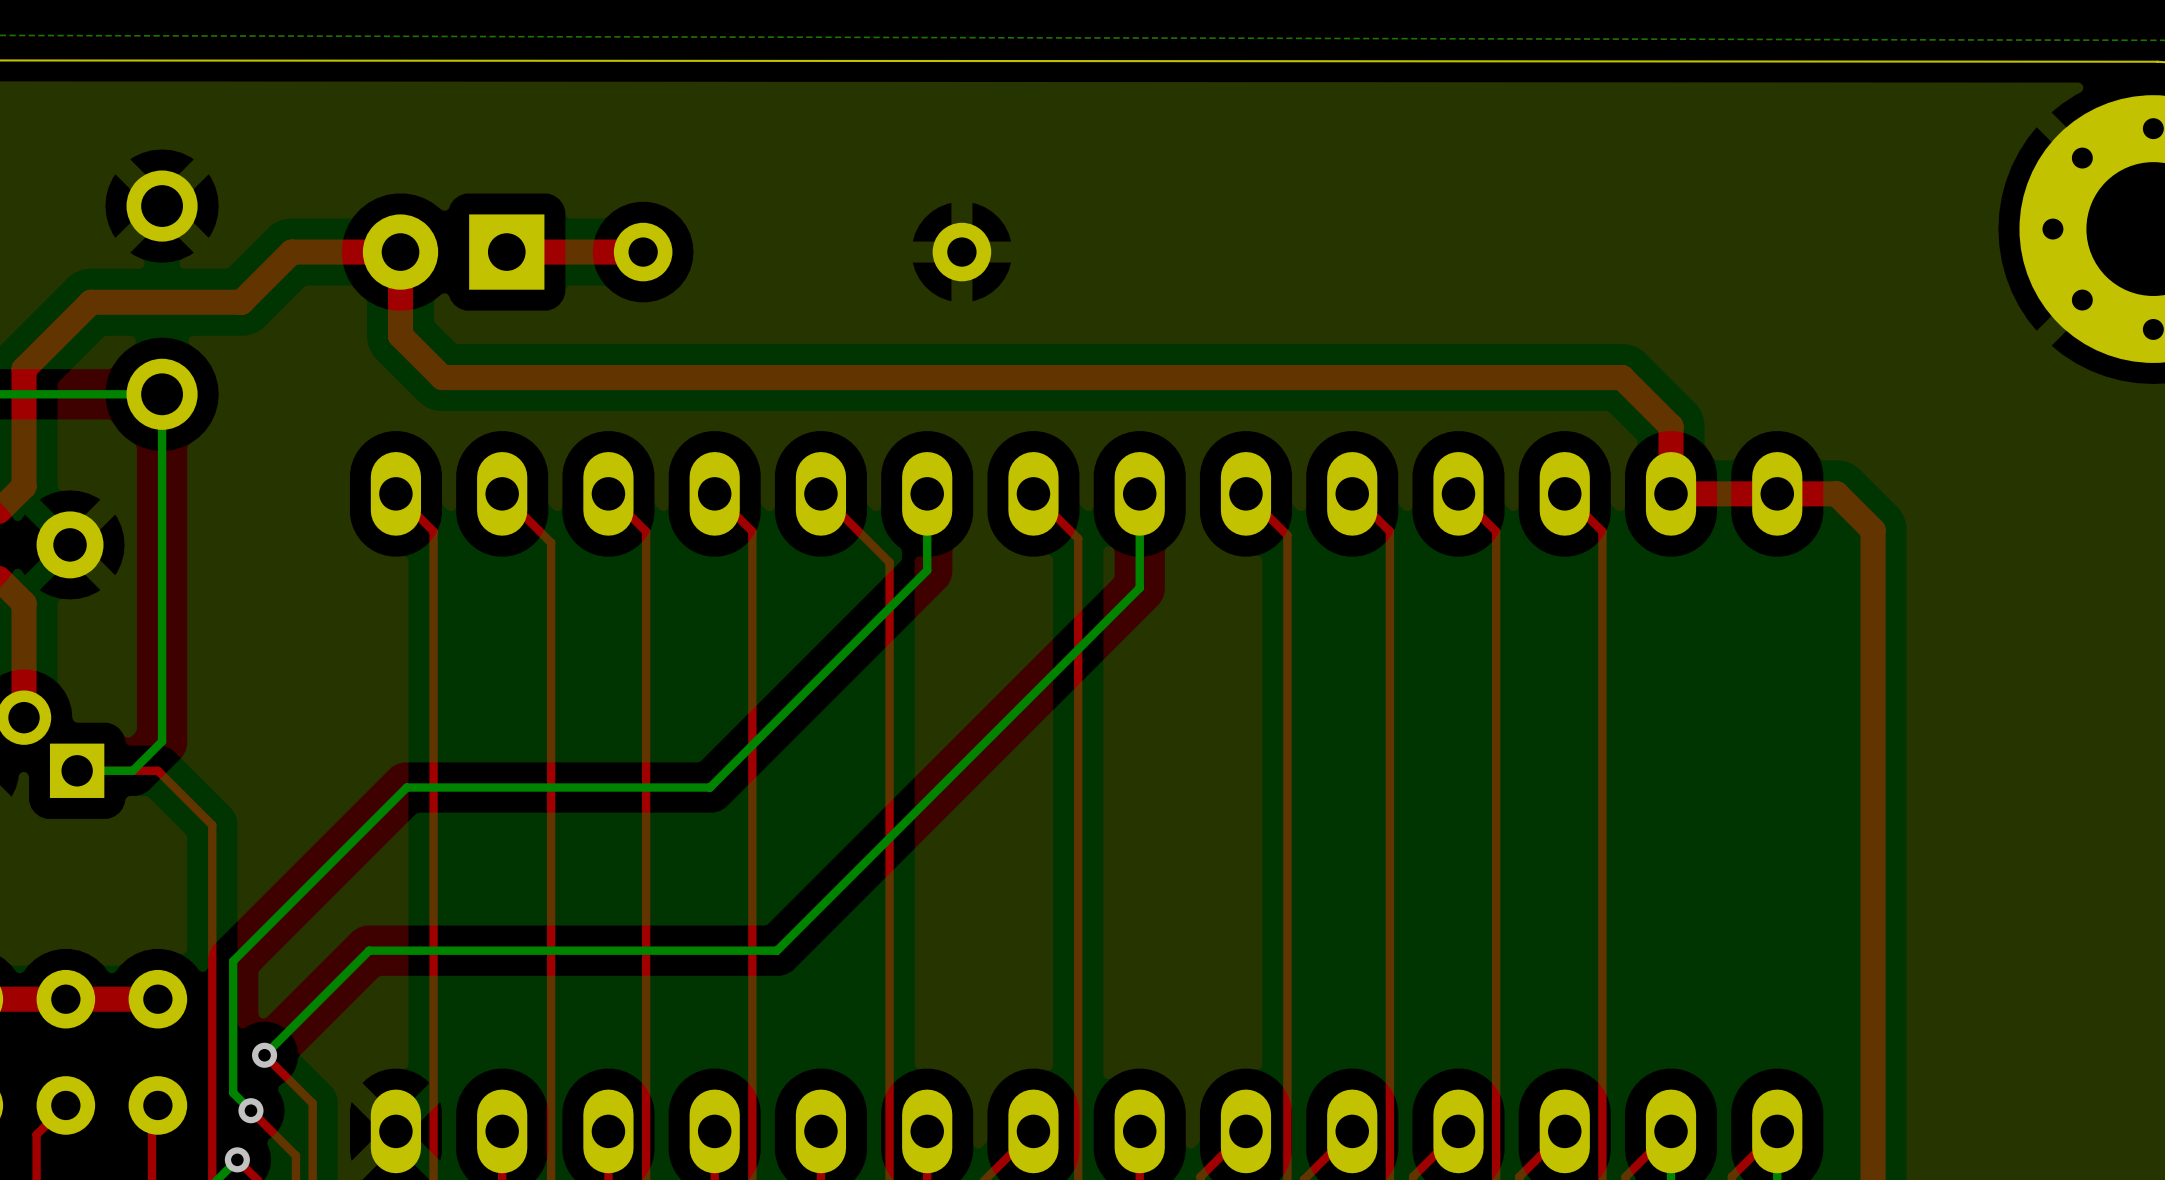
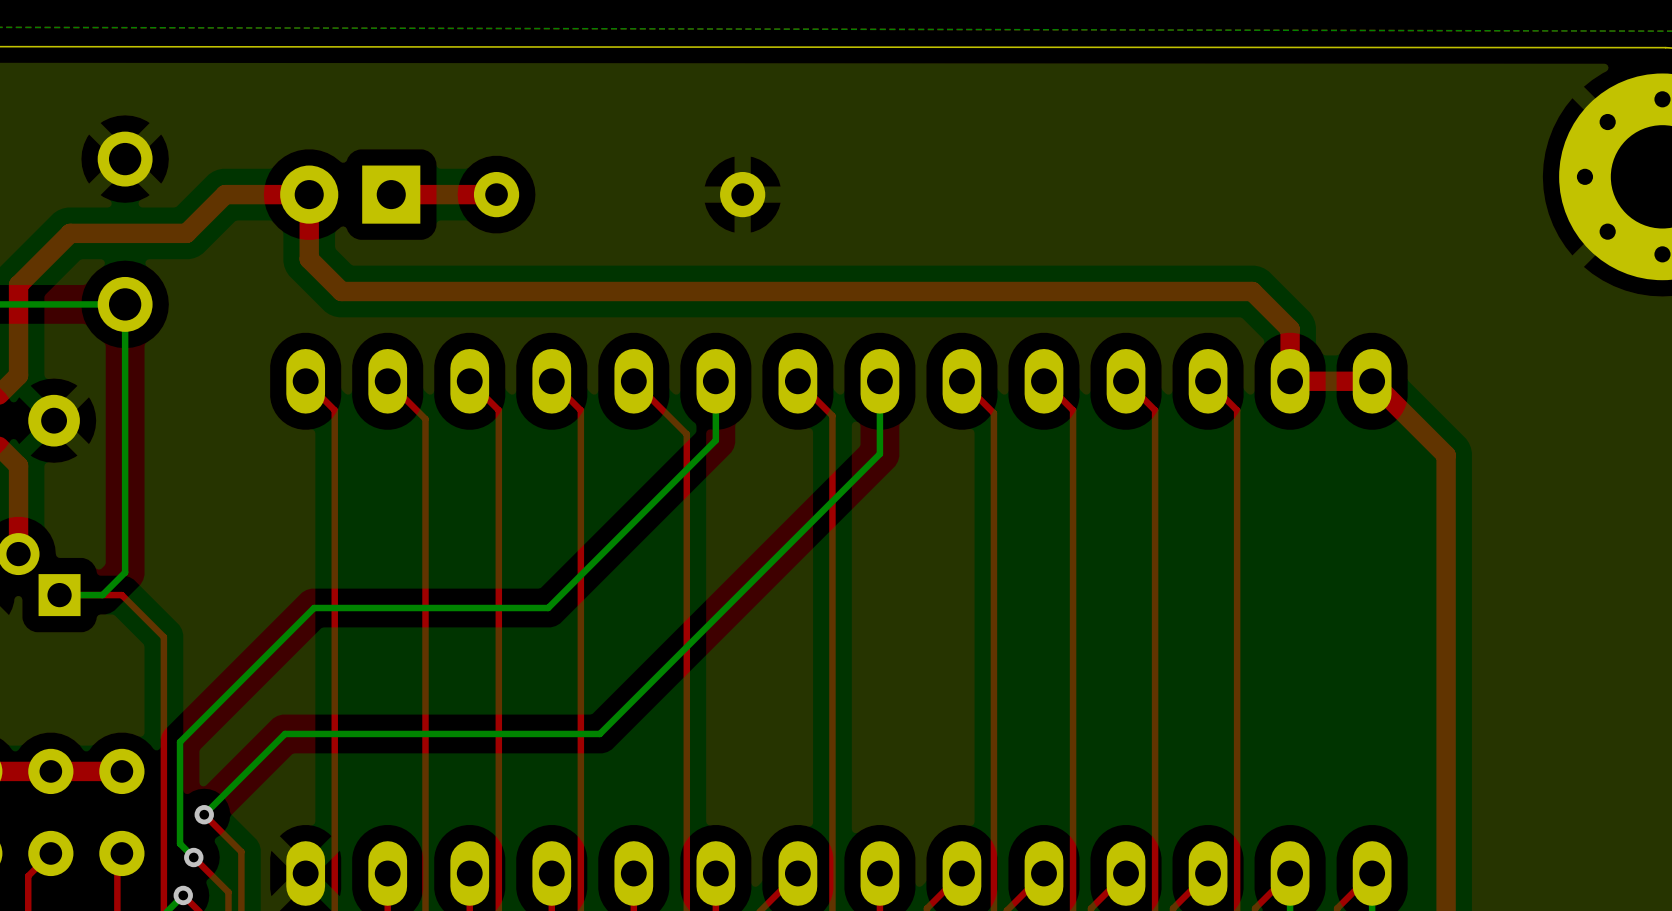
top track: (1777, 493) (1836, 493) (1873, 530) (1873, 589) -> (1372, 381) (1446, 455)

